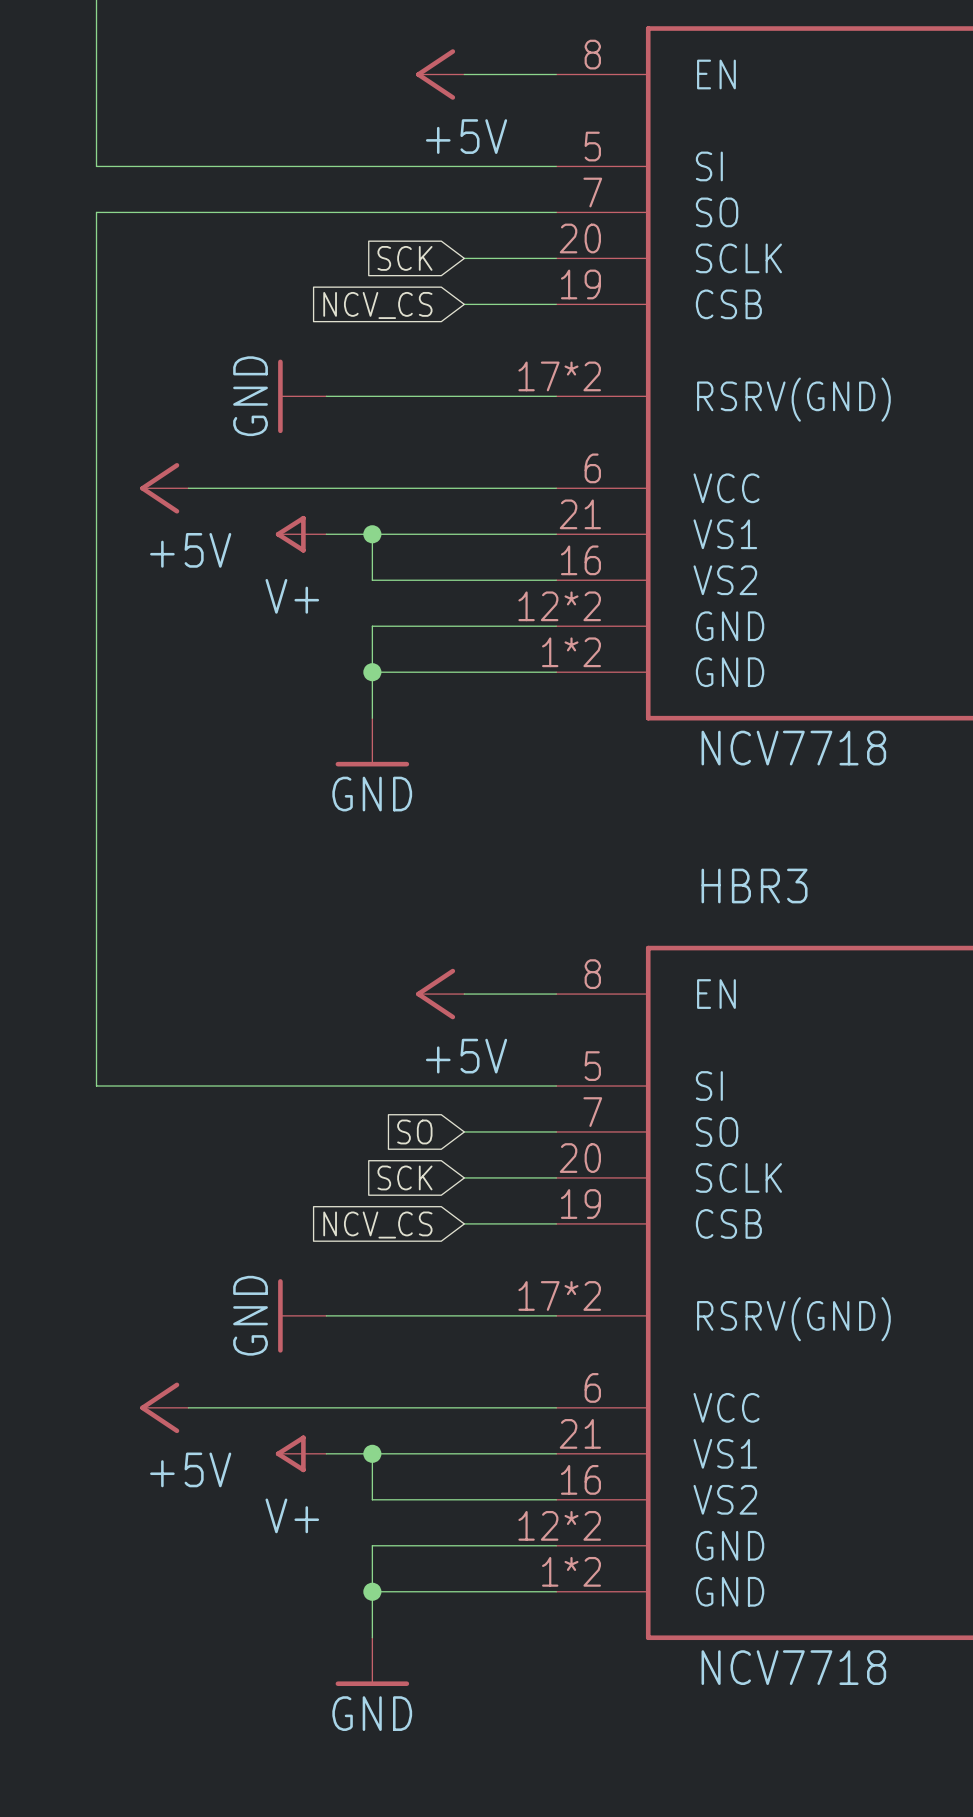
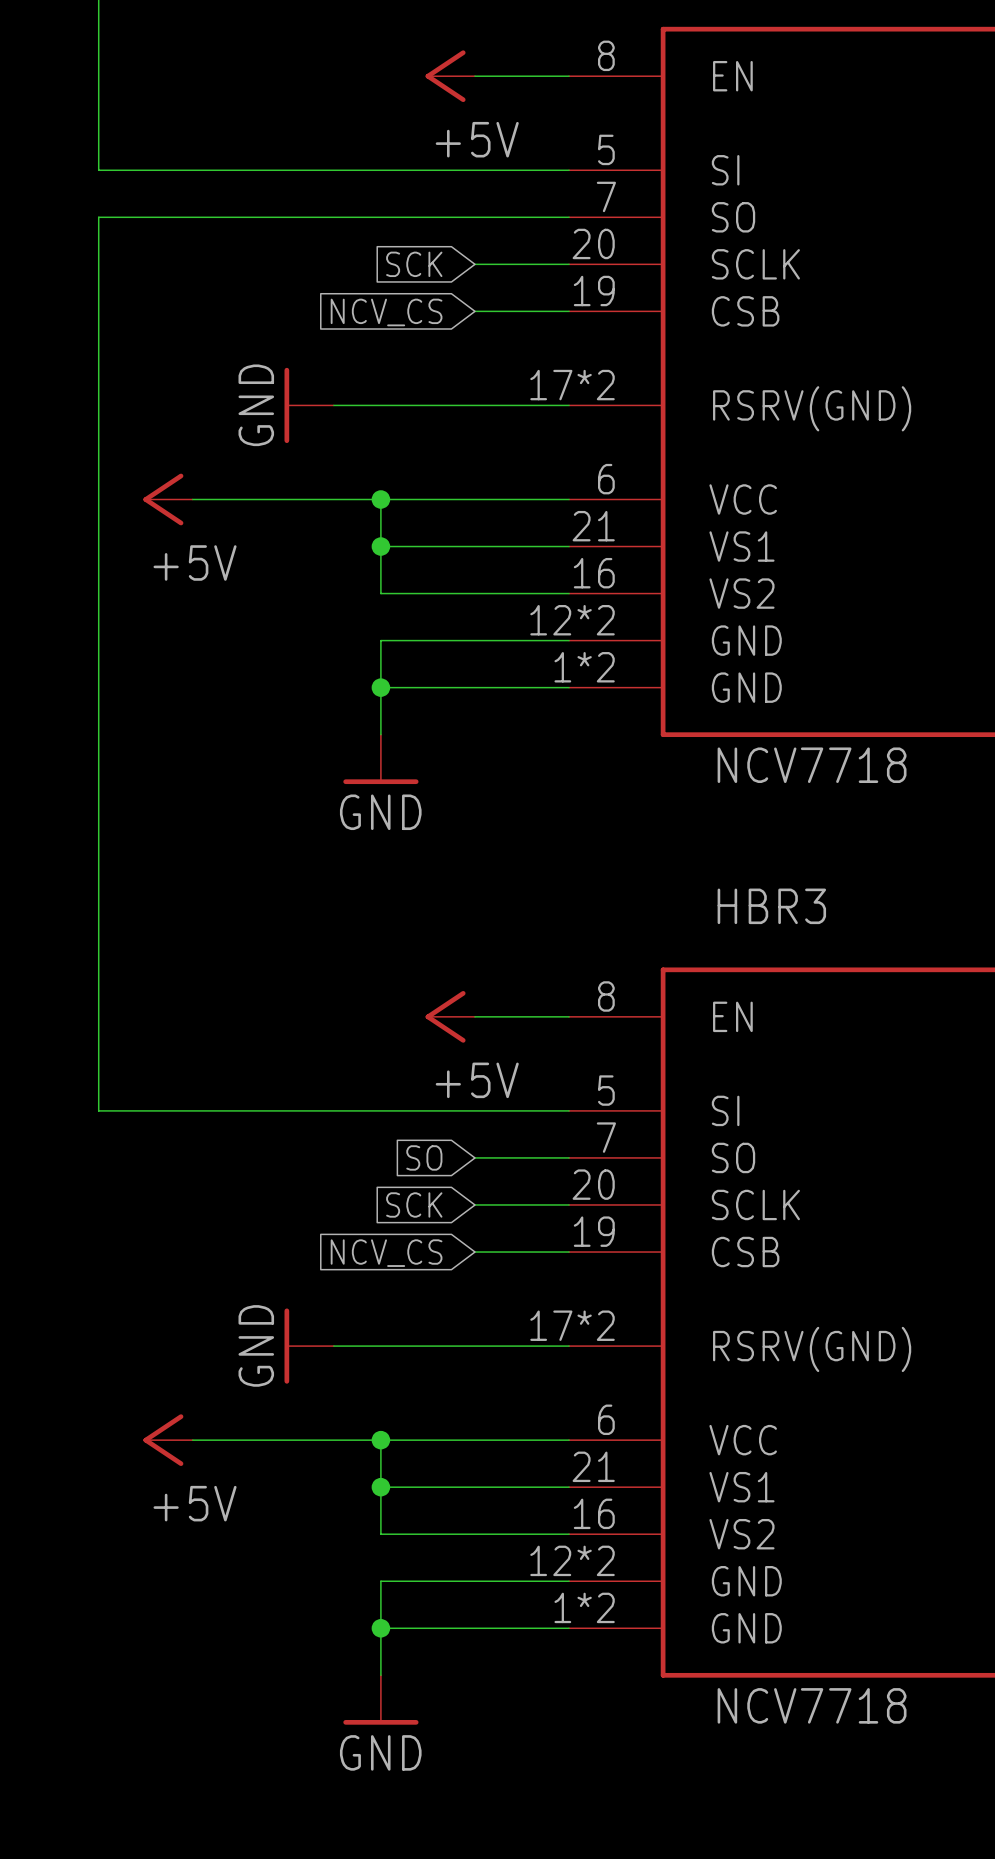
junction: none -> (380, 499)
power symbol: V+ (301, 534) -> none
wire: (326, 534) (372, 534) -> (380, 499) (380, 546)
junction: none -> (380, 1440)
power symbol: V+ (301, 1453) -> none
wire: (326, 1453) (372, 1453) -> (380, 1440) (380, 1487)

